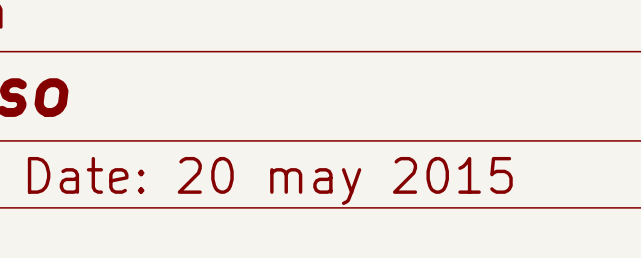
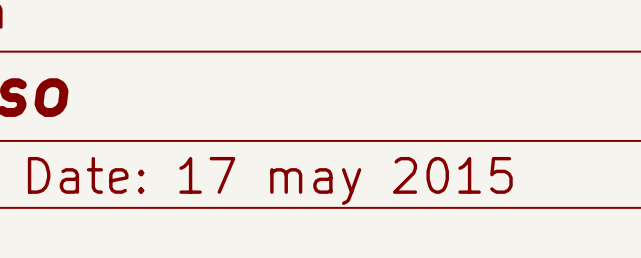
title block: Date: 20 may 2015 (270, 180) -> Date: 17 may 2015 (270, 180)

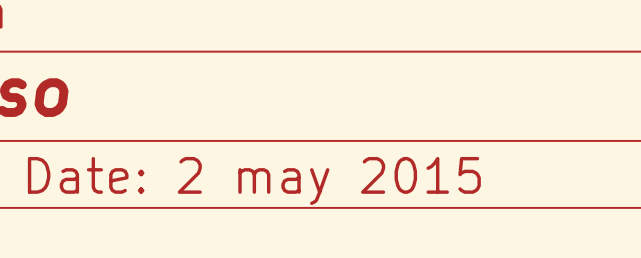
title block: Date: 17 may 2015 (270, 180) -> Date: 2 may 2015 (254, 180)

